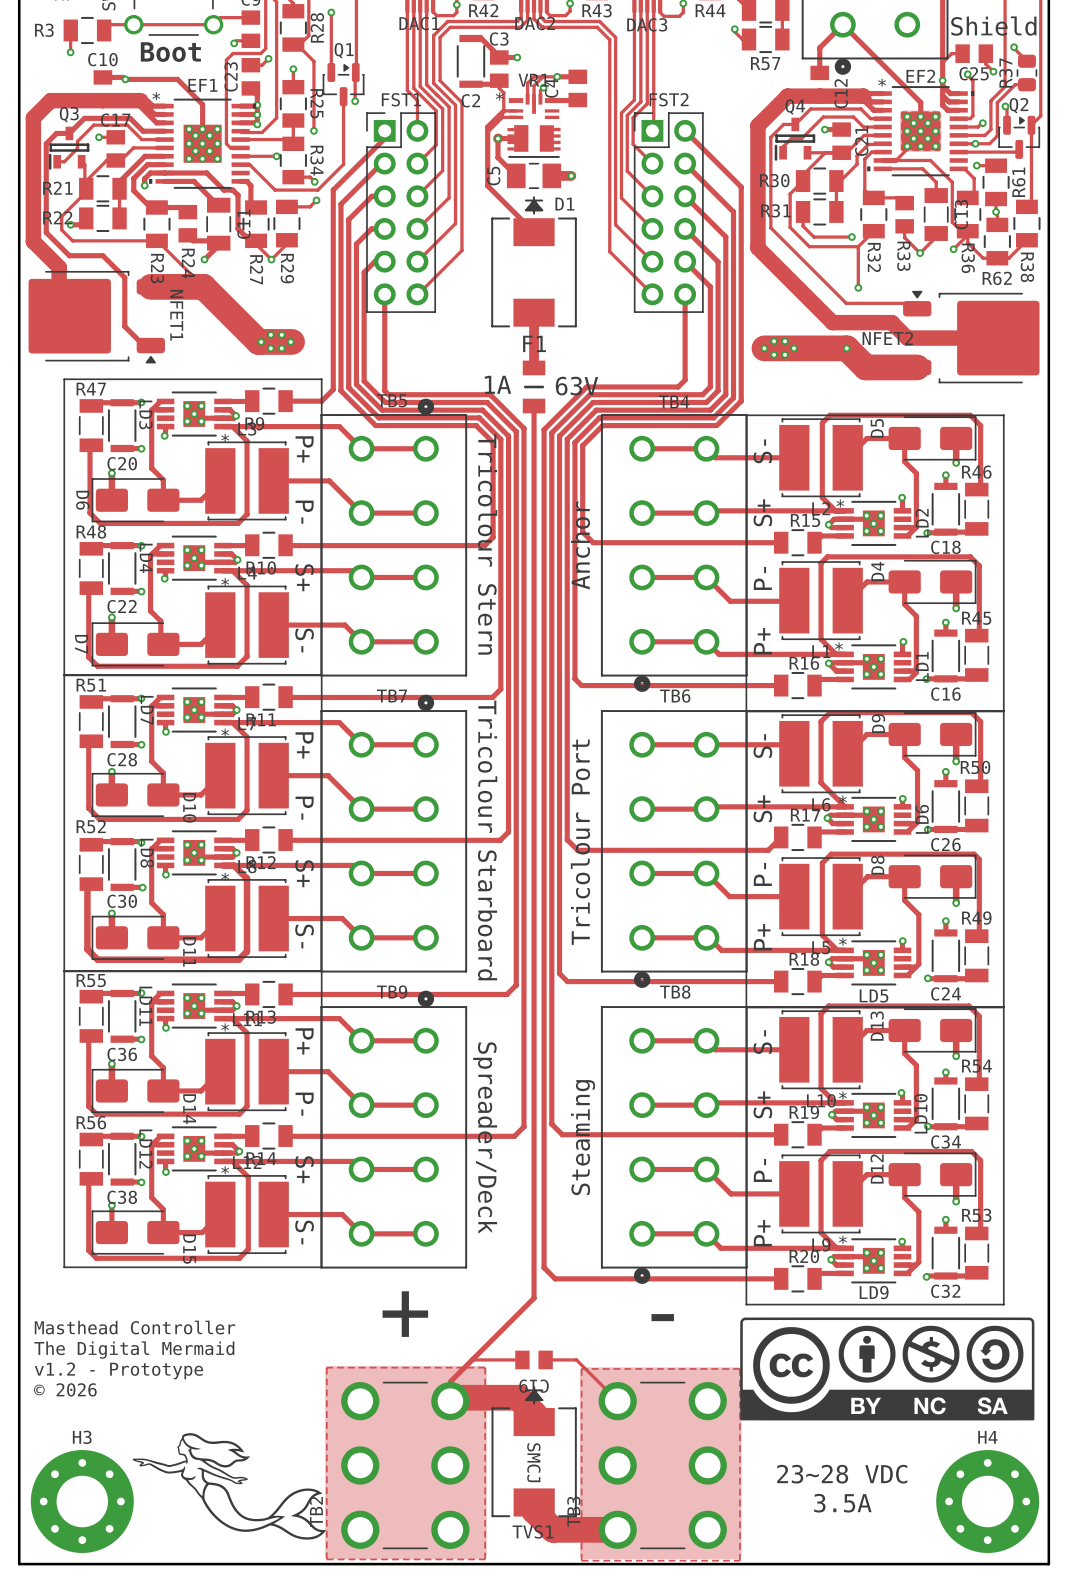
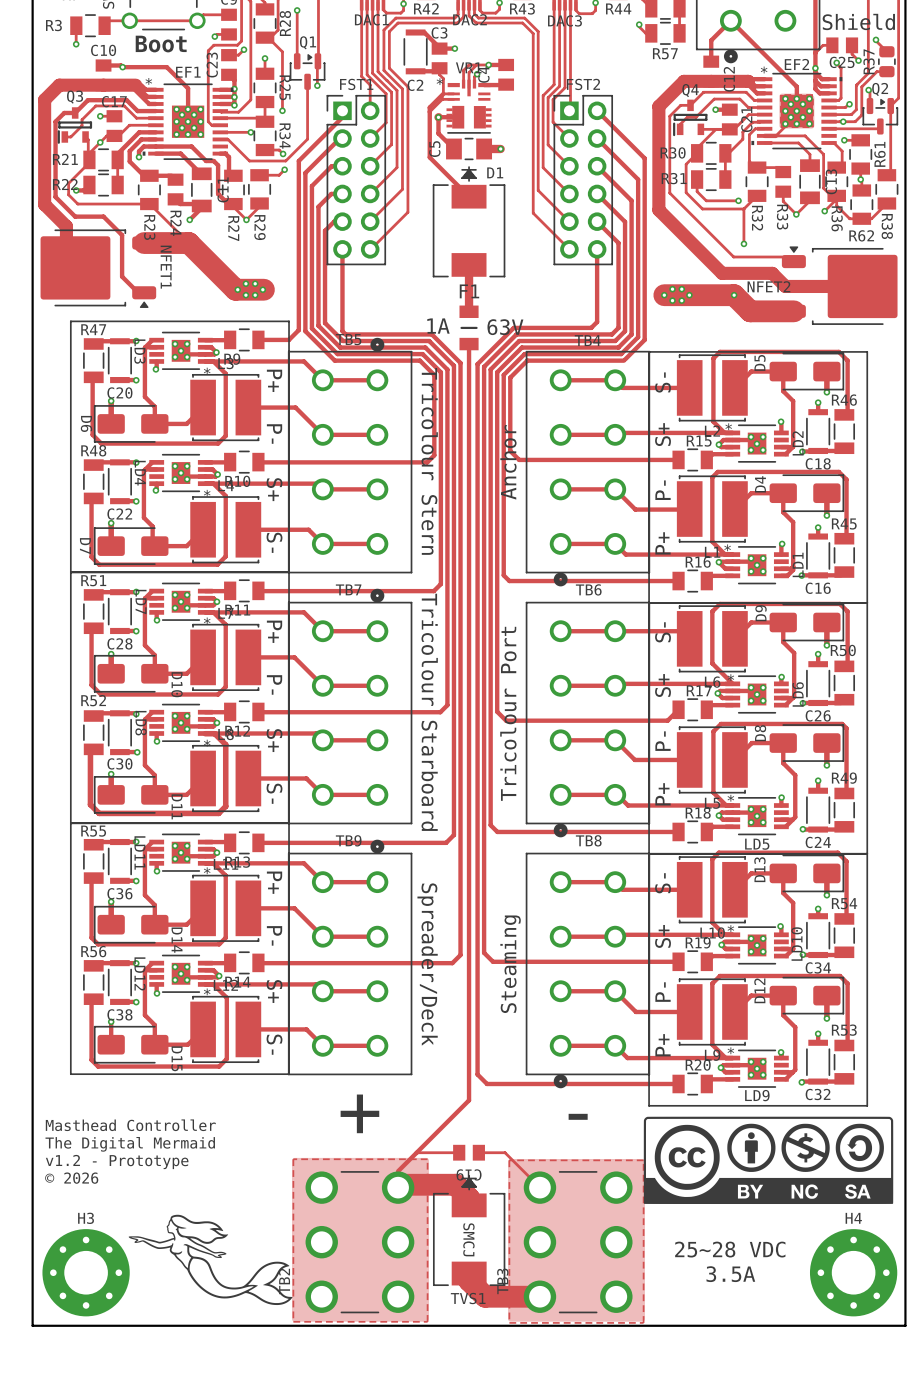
via: none -> (100, 142)
text: 23~28 VDC (842, 1474) -> 25~28 VDC (730, 1249)

